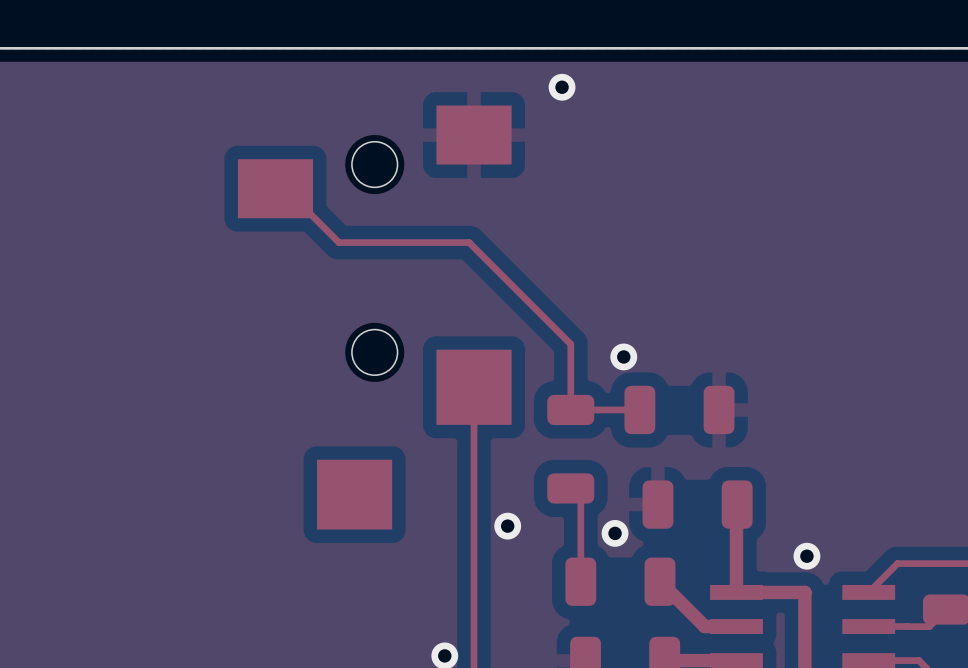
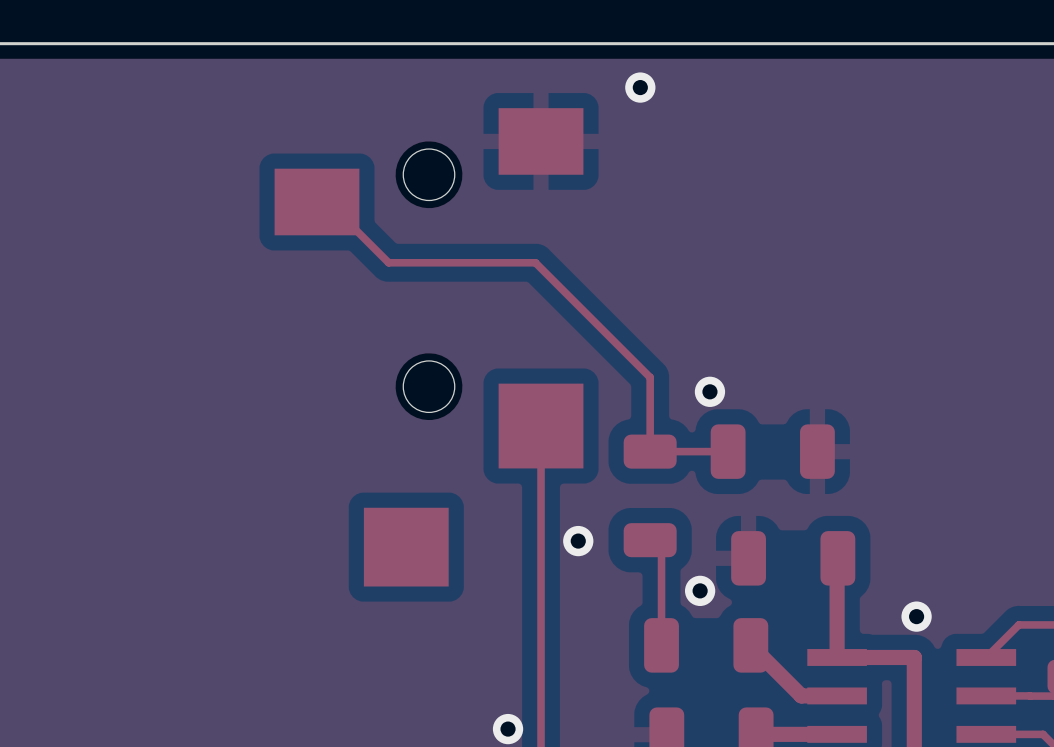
via position: (507, 526) -> (578, 541)

